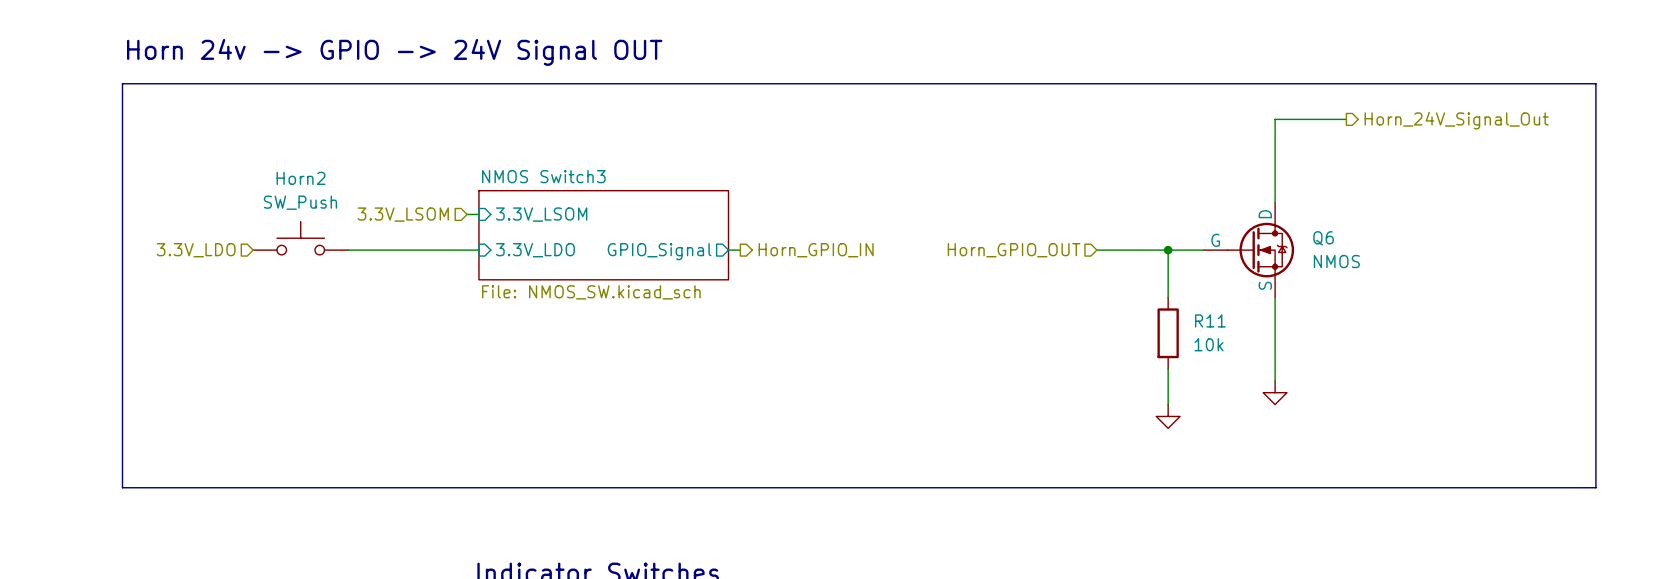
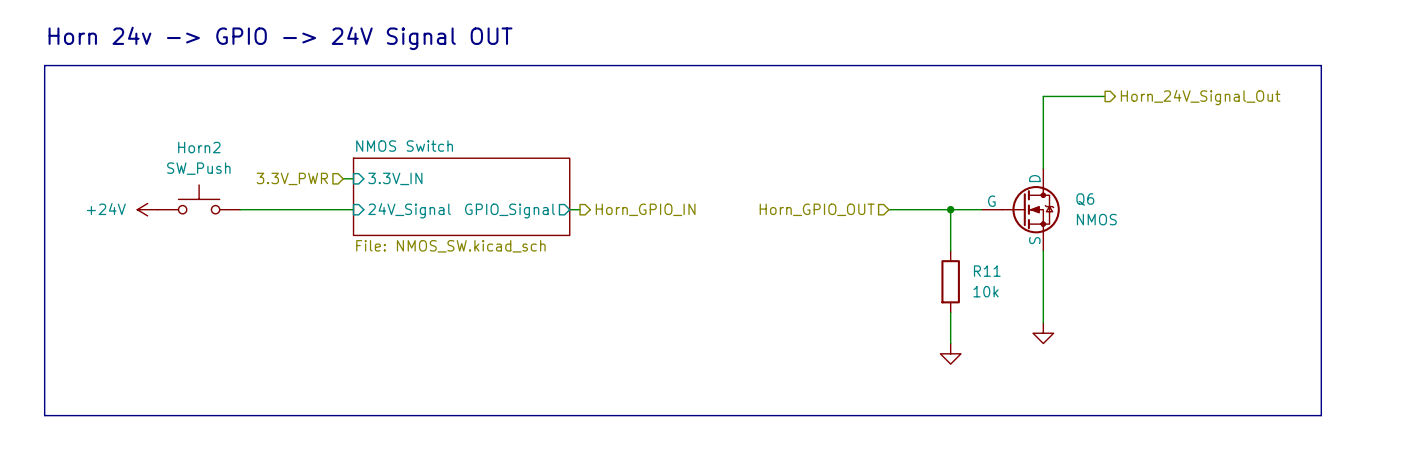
sheet NMOS Switch3 name: NMOS Switch3 (543, 176) -> NMOS Switch (404, 146)
hierarchical label: 3.3V_LSOM (403, 214) -> 3.3V_PWR (292, 178)
sheet pin: 3.3V_LSOM (541, 214) -> 3.3V_IN (395, 178)
hierarchical label: 3.3V_LDO (196, 250) -> none
power symbol: none -> +24V (147, 209)
sheet pin: 3.3V_LDO (535, 250) -> 24V_Signal (409, 210)

